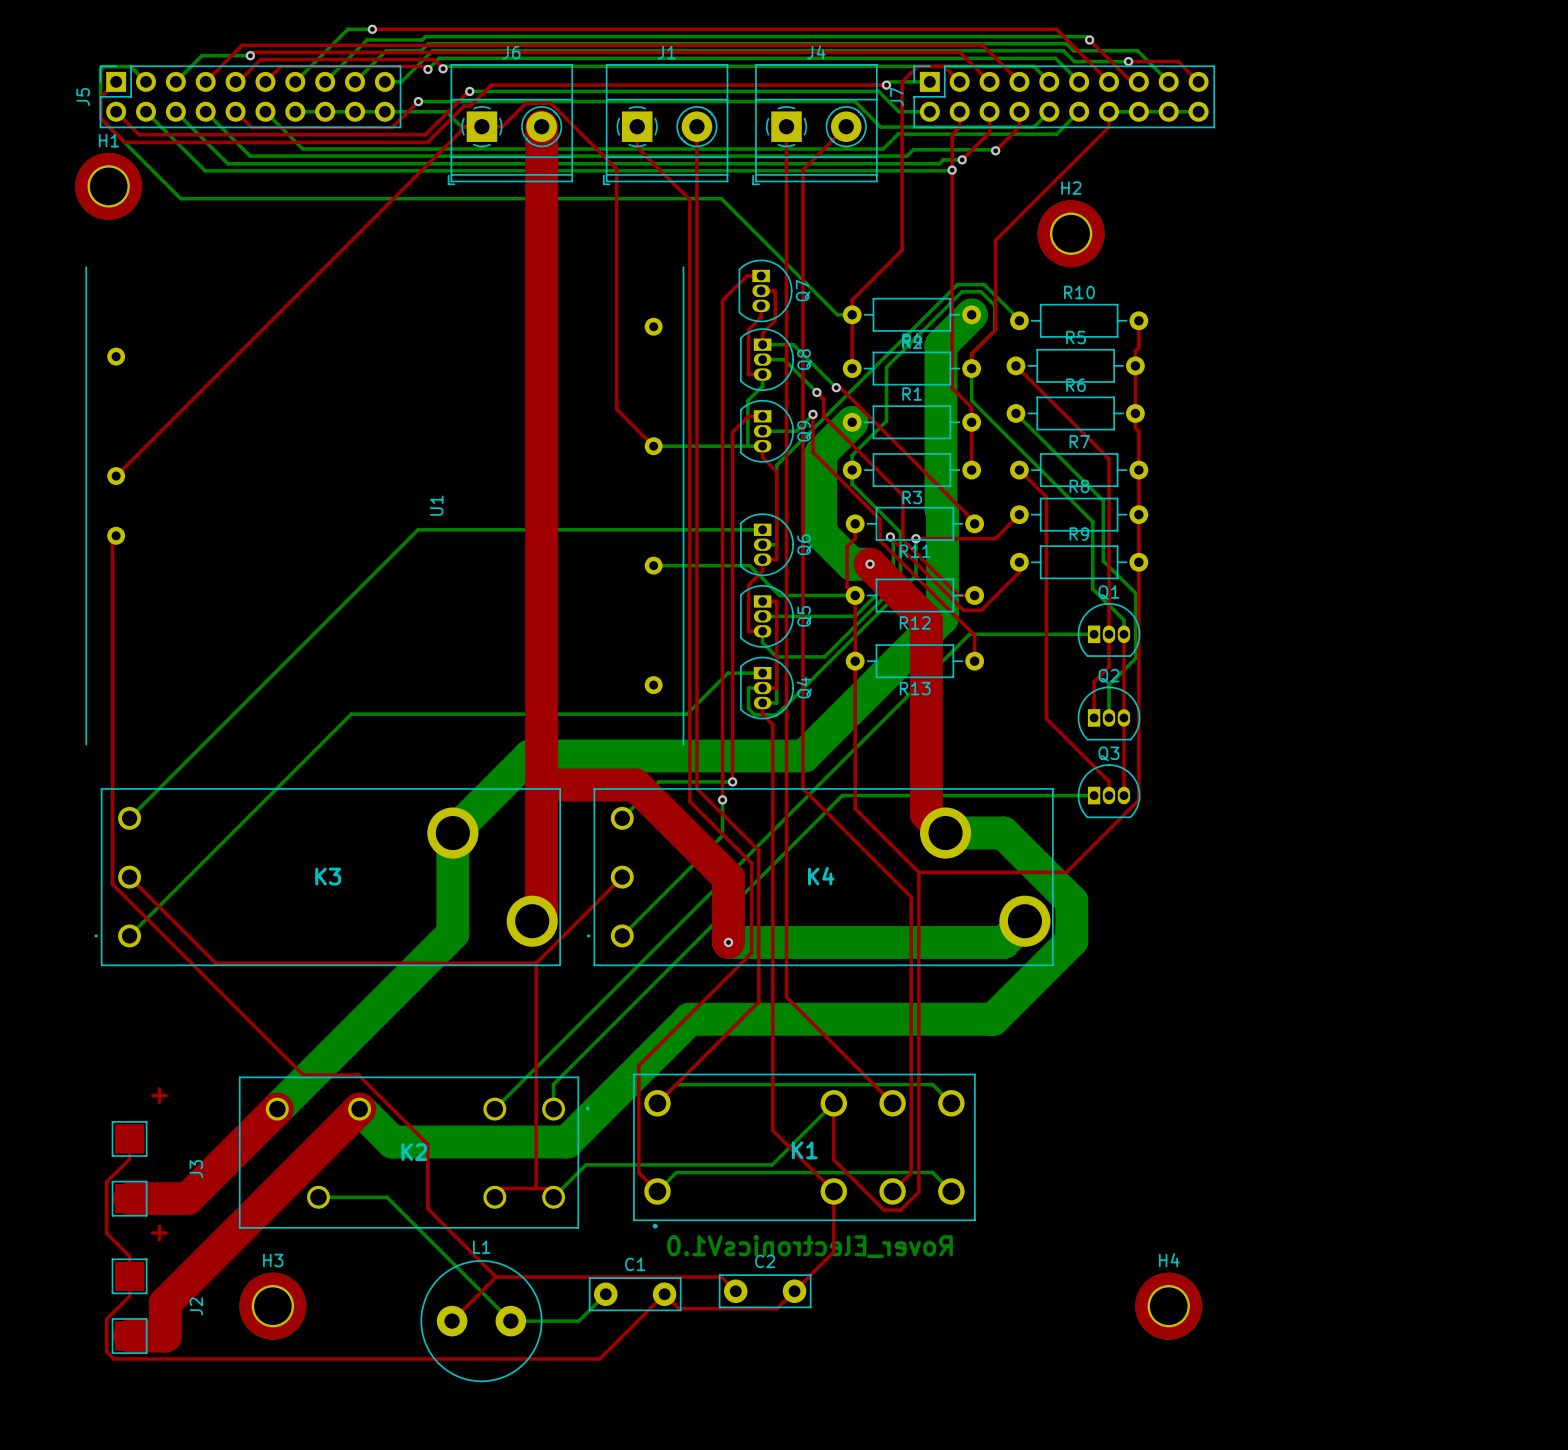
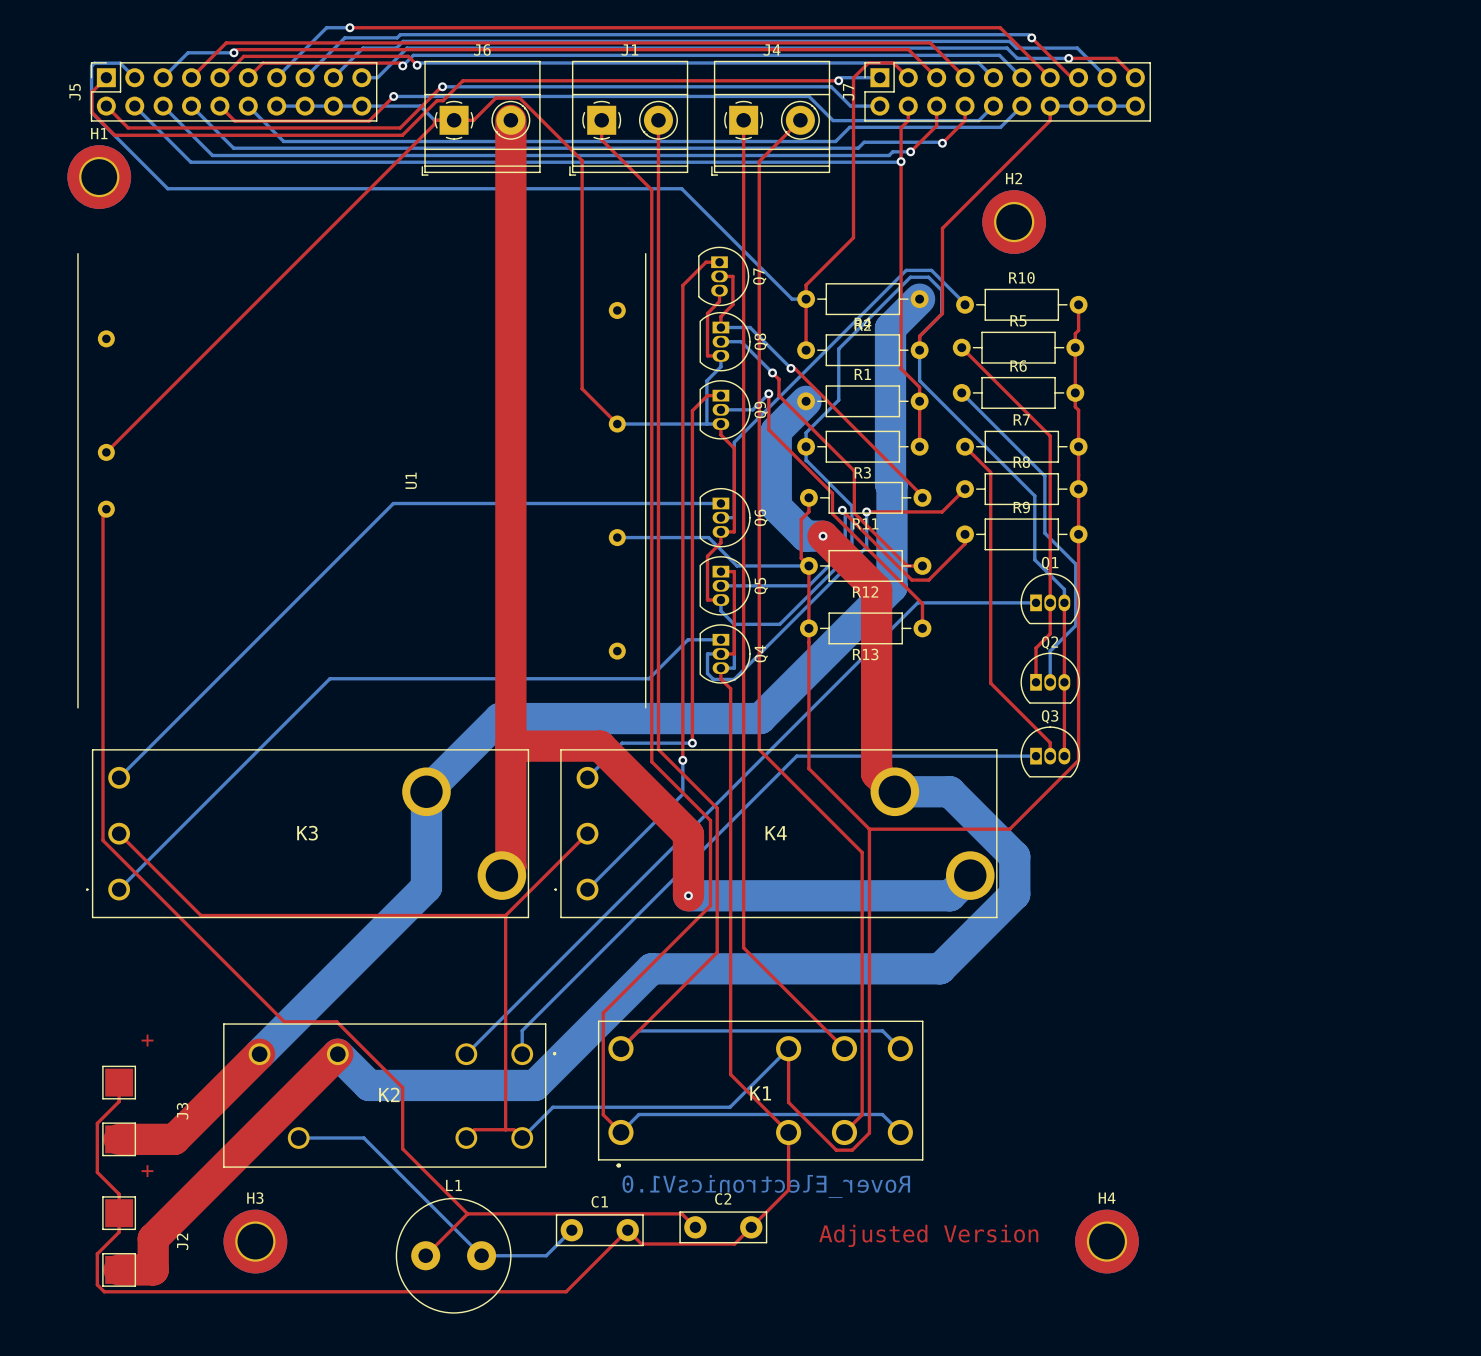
text: none -> Adjusted Version (928, 1235)

